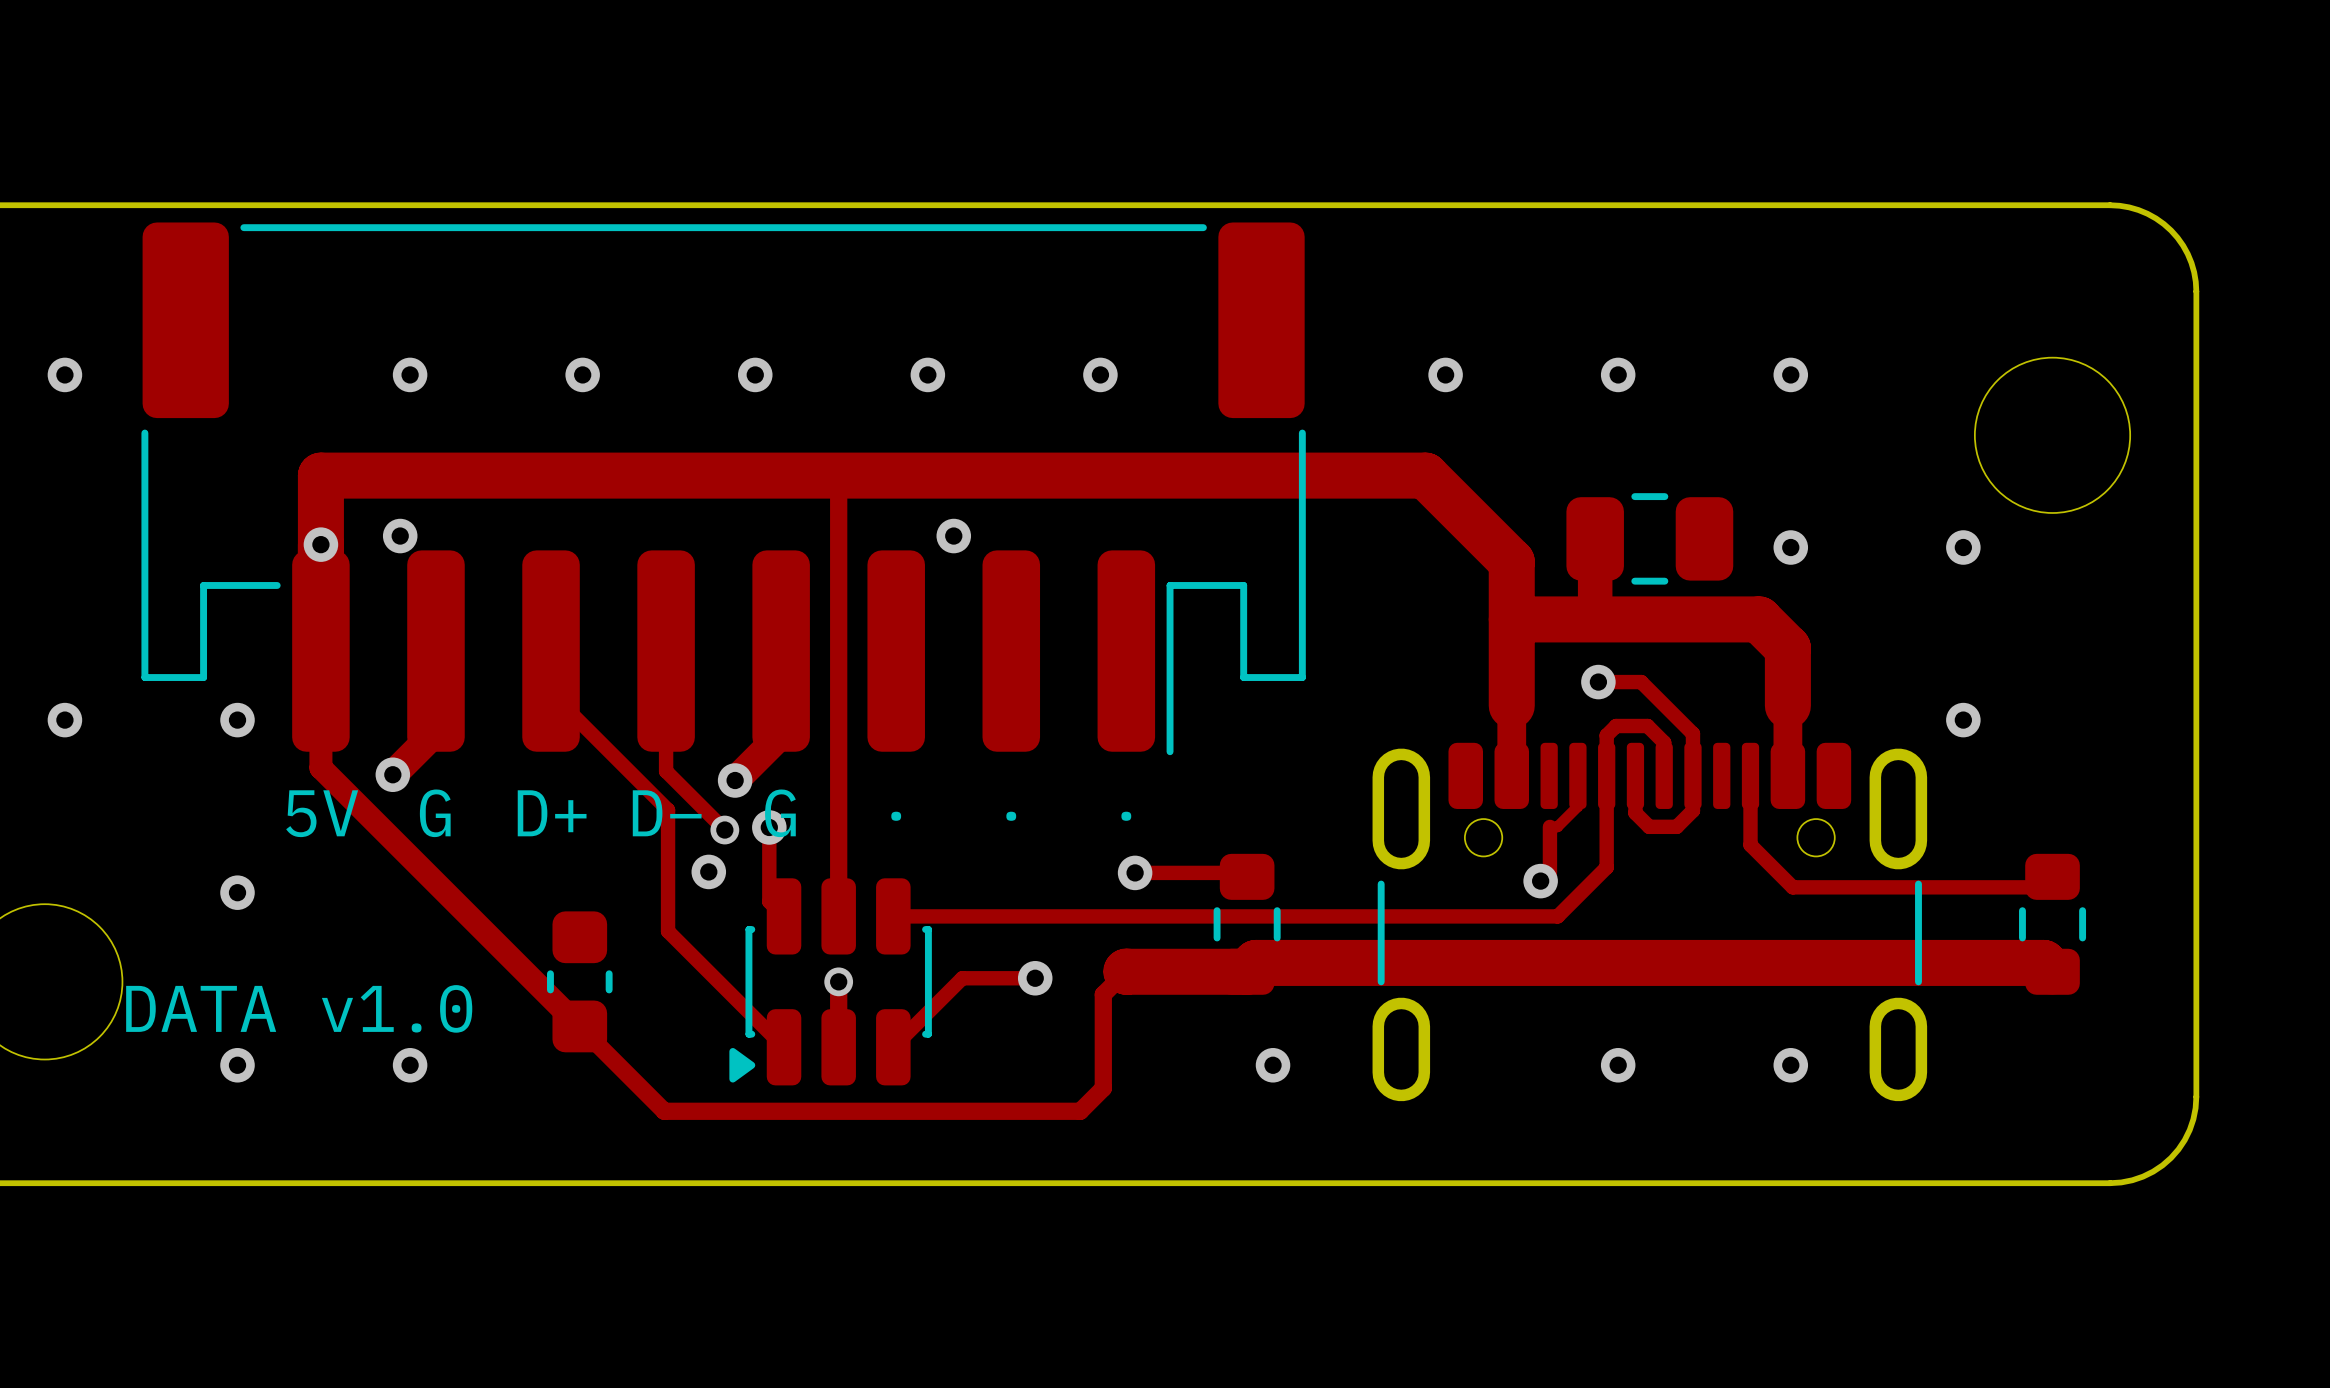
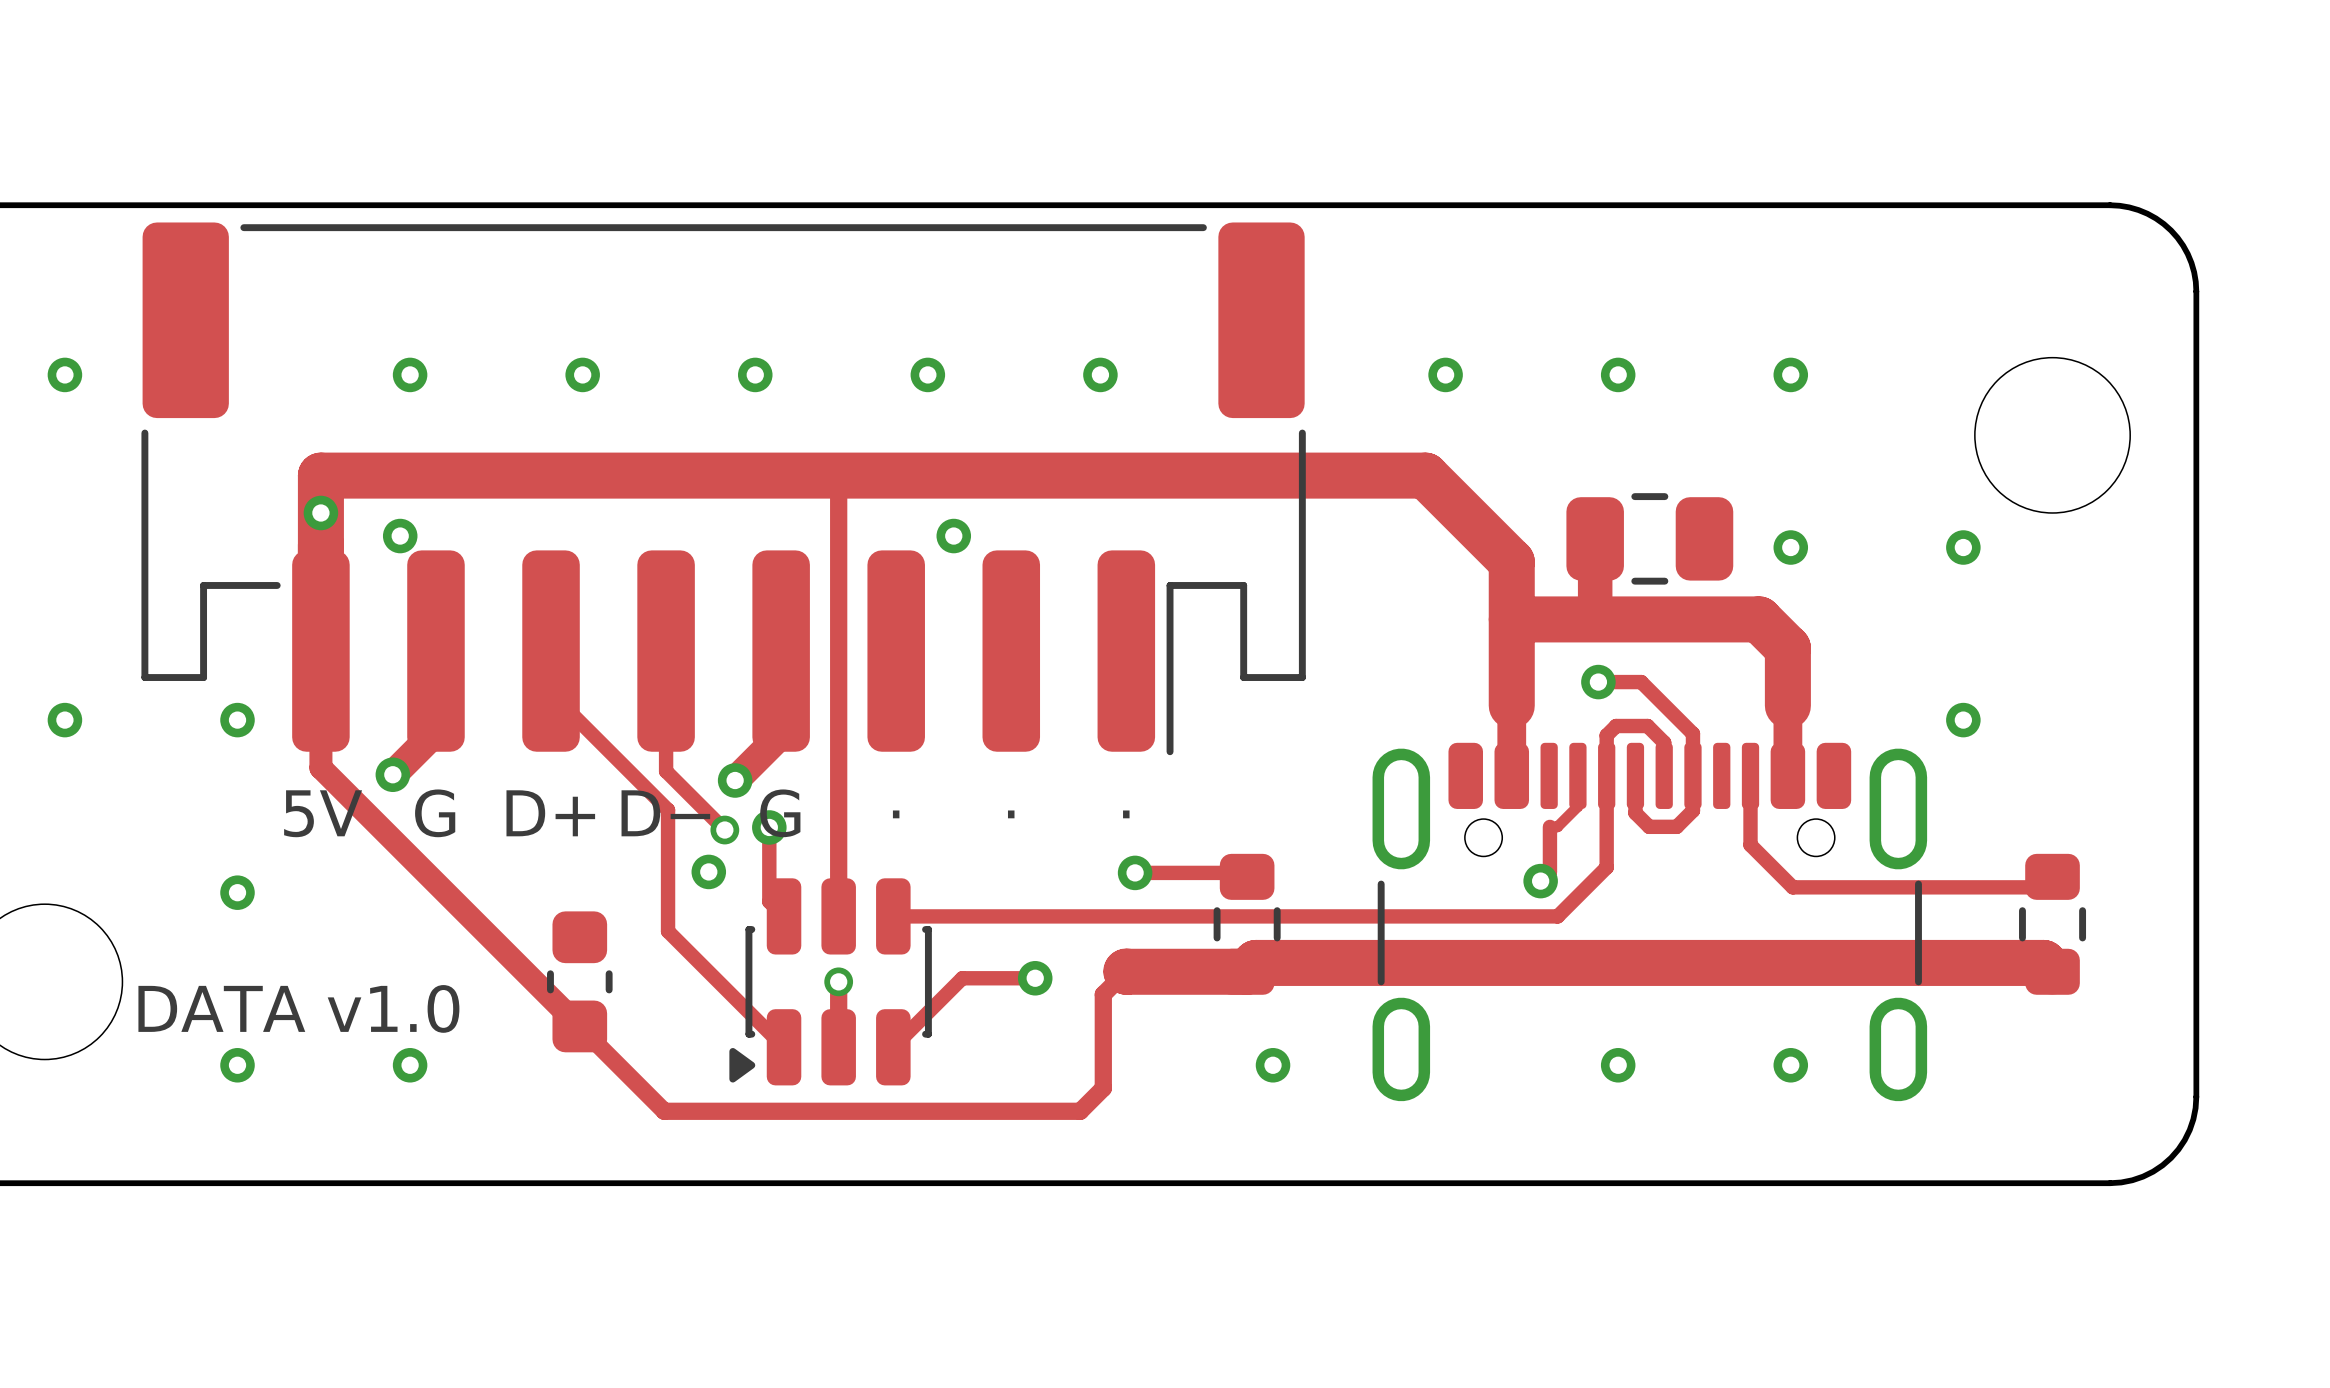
via position: (320, 544) -> (320, 512)

